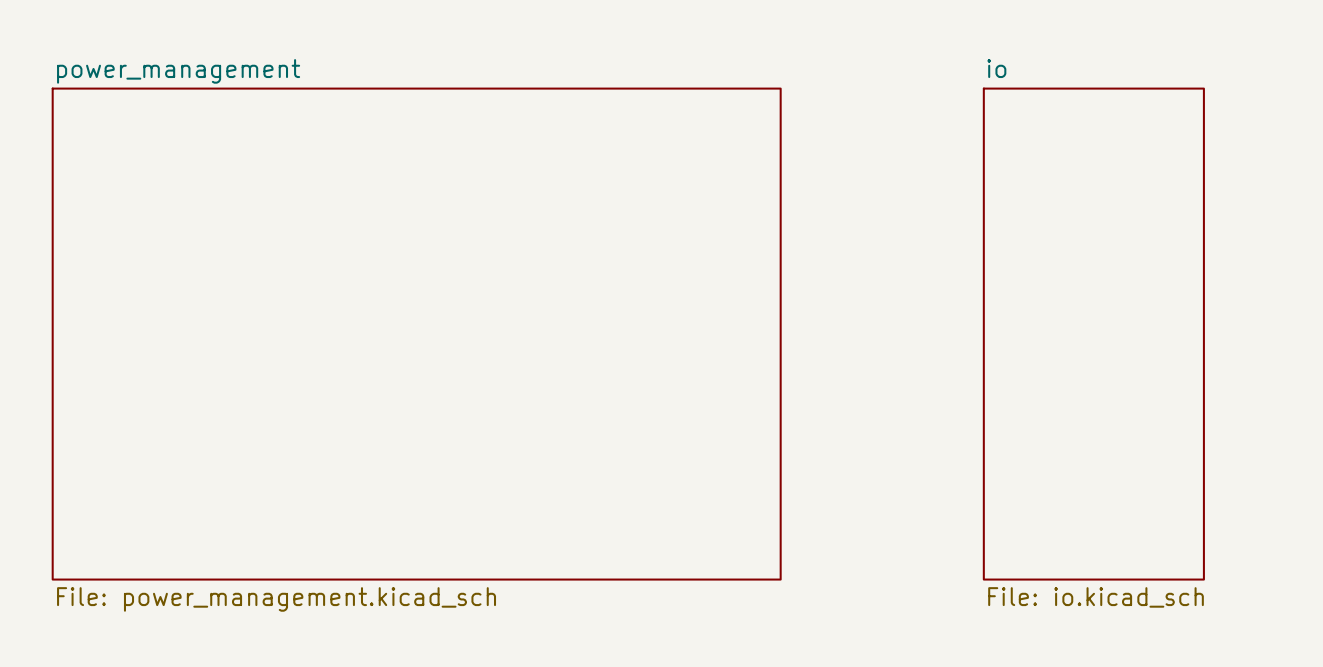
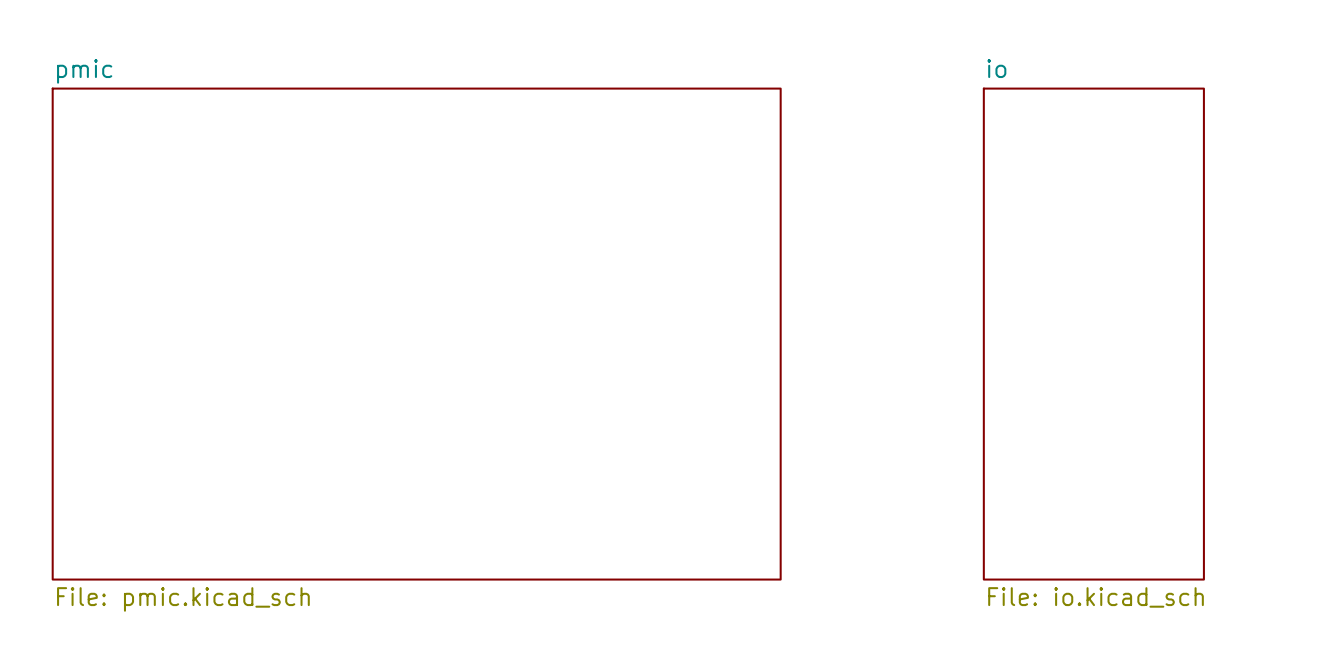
sheet power_management name: power_management (178, 71) -> pmic (84, 71)
sheet power_management value: File: power_management.kicad_sch (276, 599) -> File: pmic.kicad_sch (183, 599)

